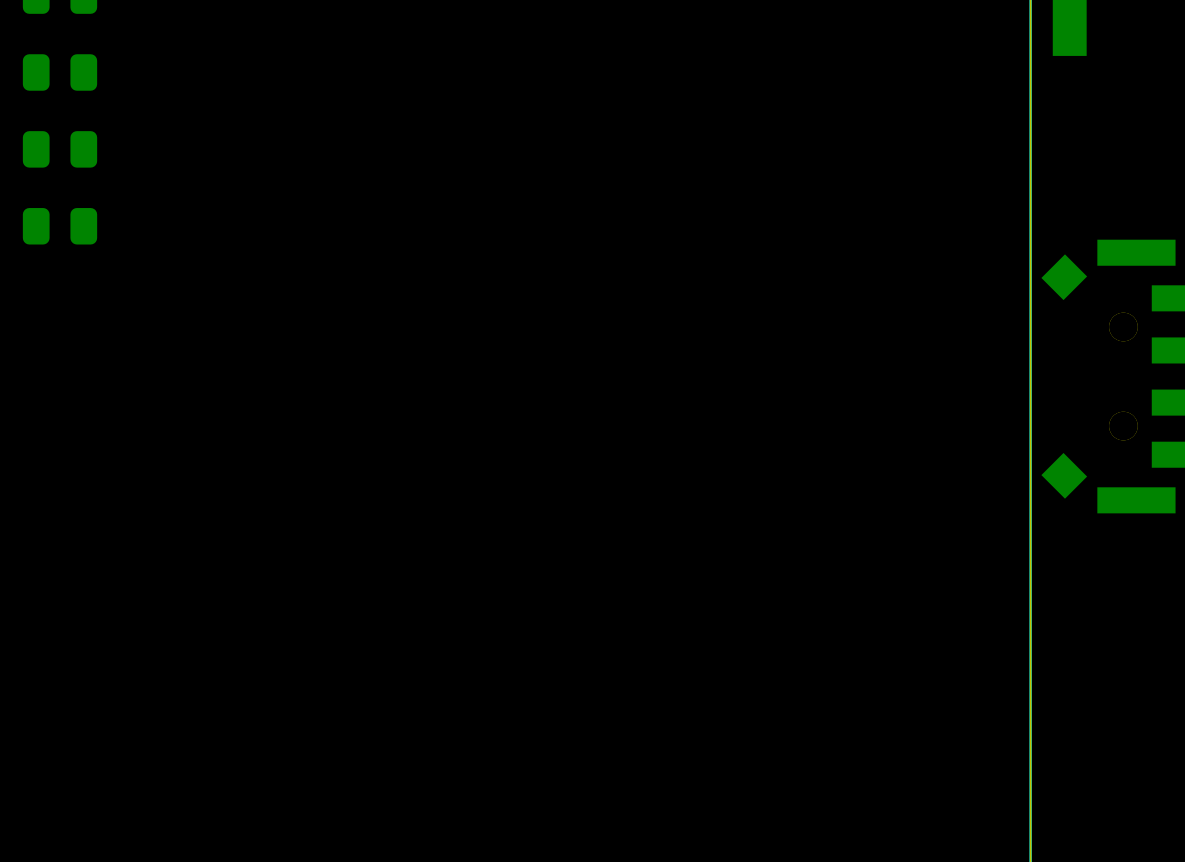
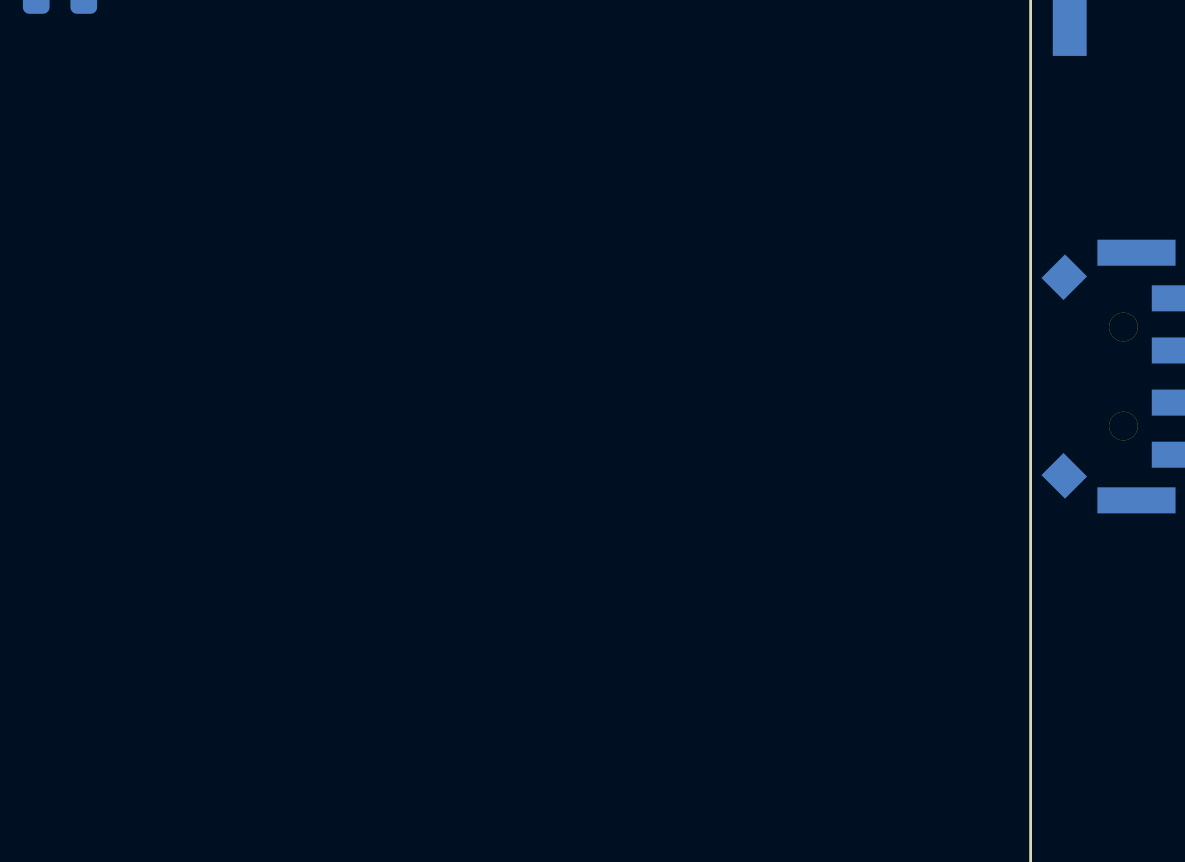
part: (60, 72) -> none
part: (60, 149) -> none
part: (60, 226) -> none

